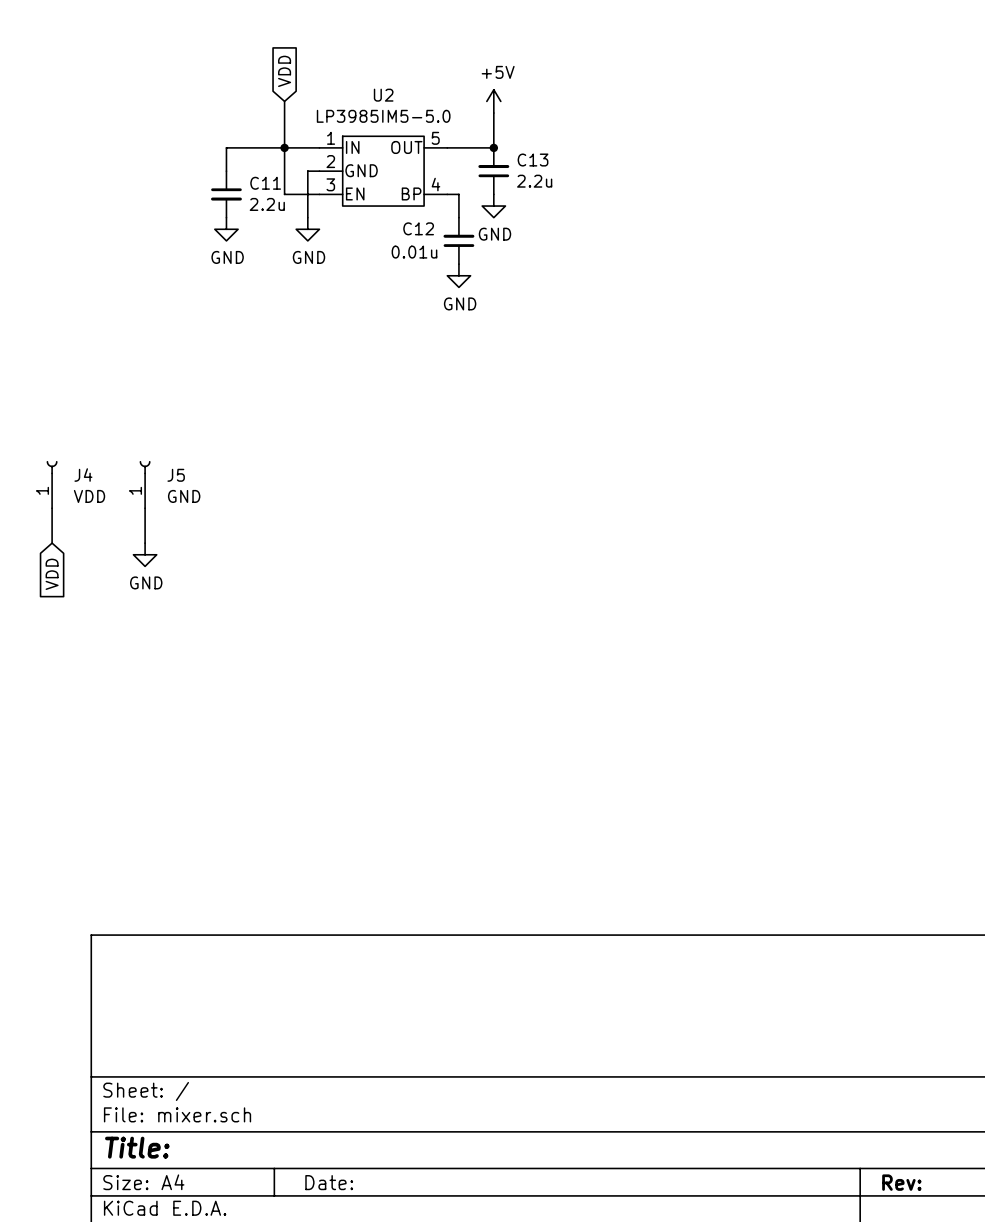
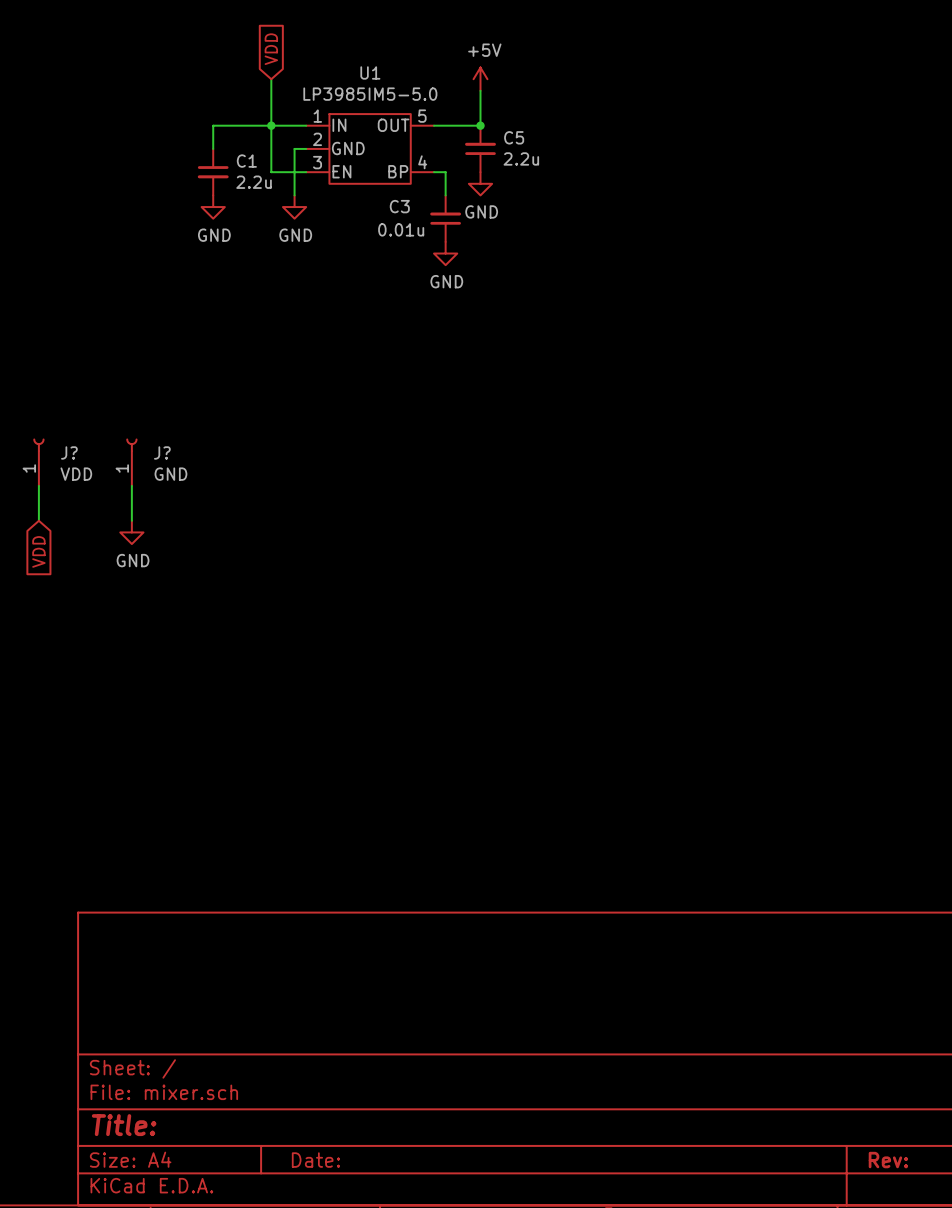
U2 name: U2 (383, 95) -> U1 (370, 72)
C13 name: C13 (533, 160) -> C5 (514, 137)
C11 name: C11 (265, 183) -> C1 (246, 161)
C12 name: C12 (418, 228) -> C3 (399, 206)
J4 name: J4 (83, 475) -> J? (69, 452)
J5 name: J5 (176, 475) -> J? (162, 452)

